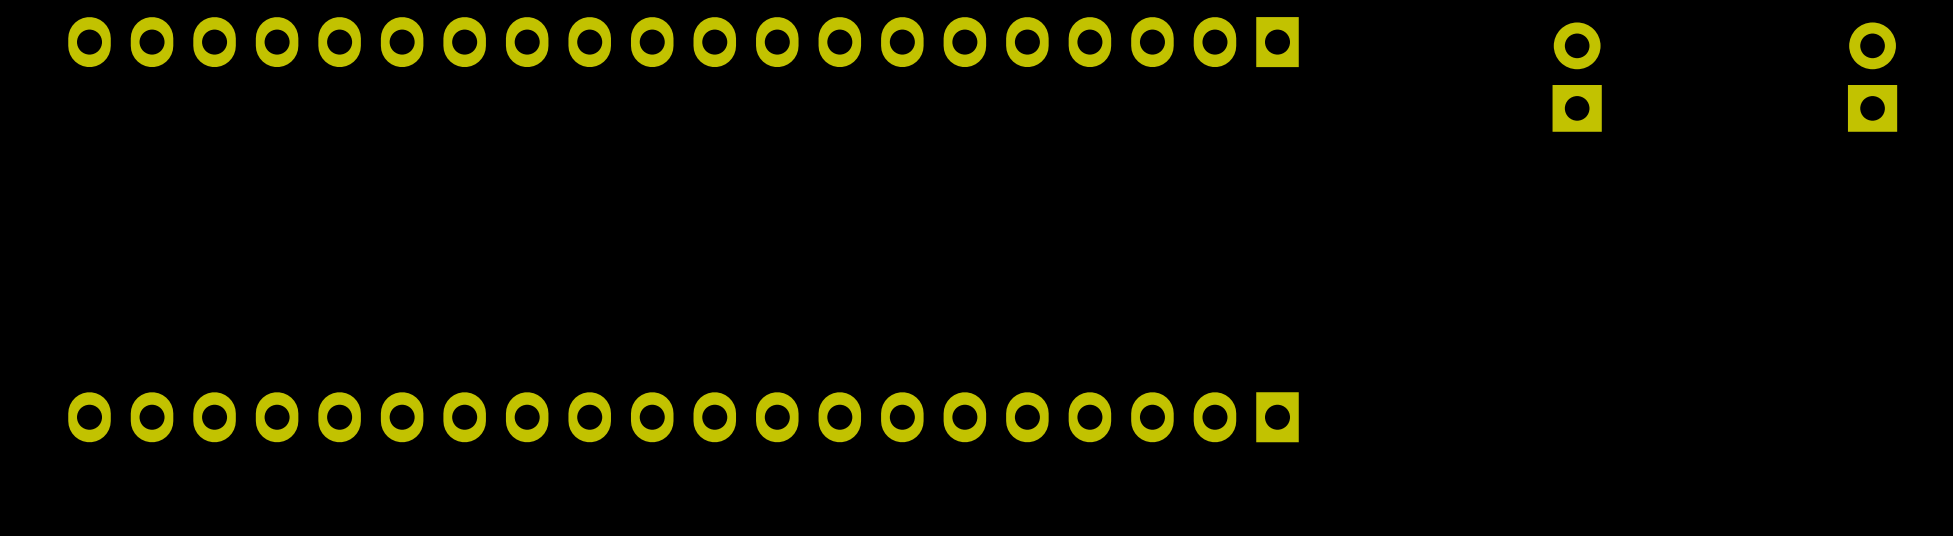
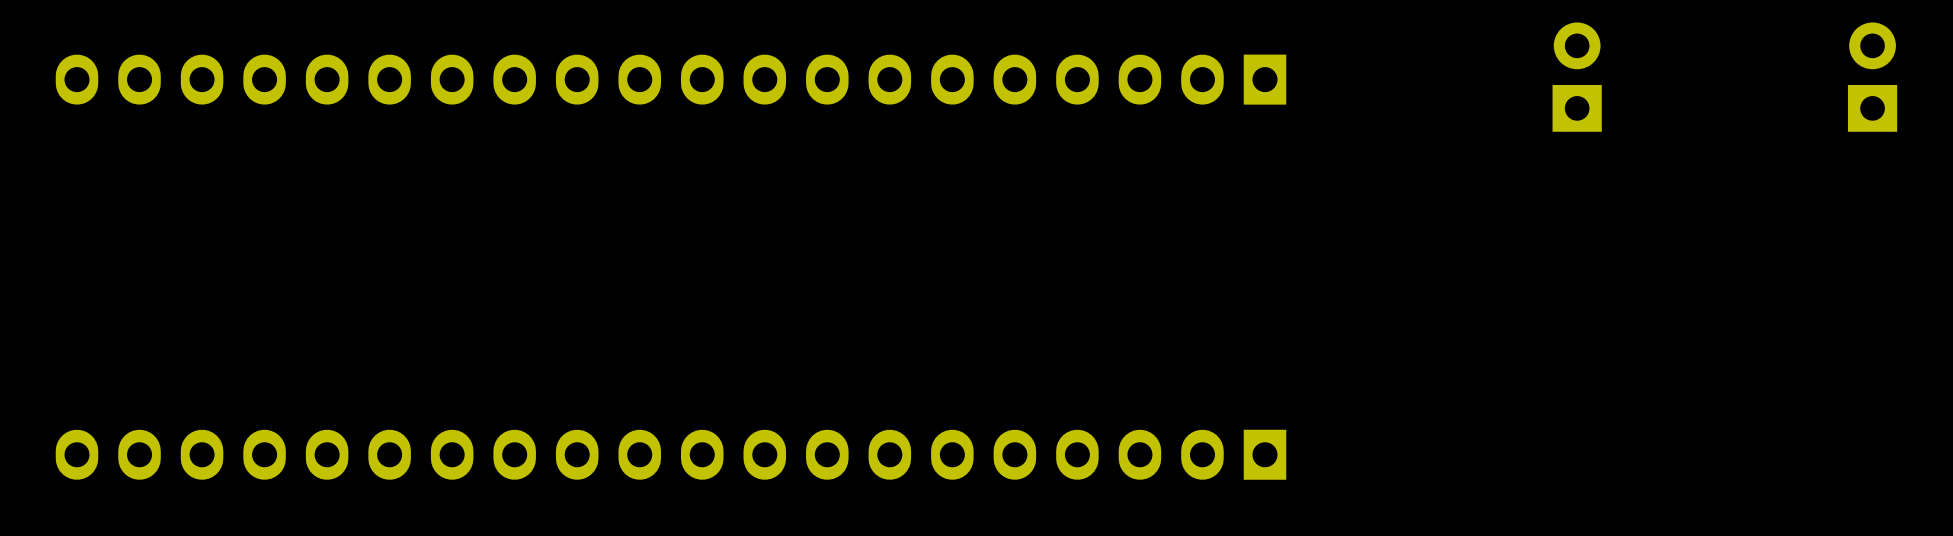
part position: (683, 42) -> (670, 79)
part position: (683, 417) -> (670, 454)

